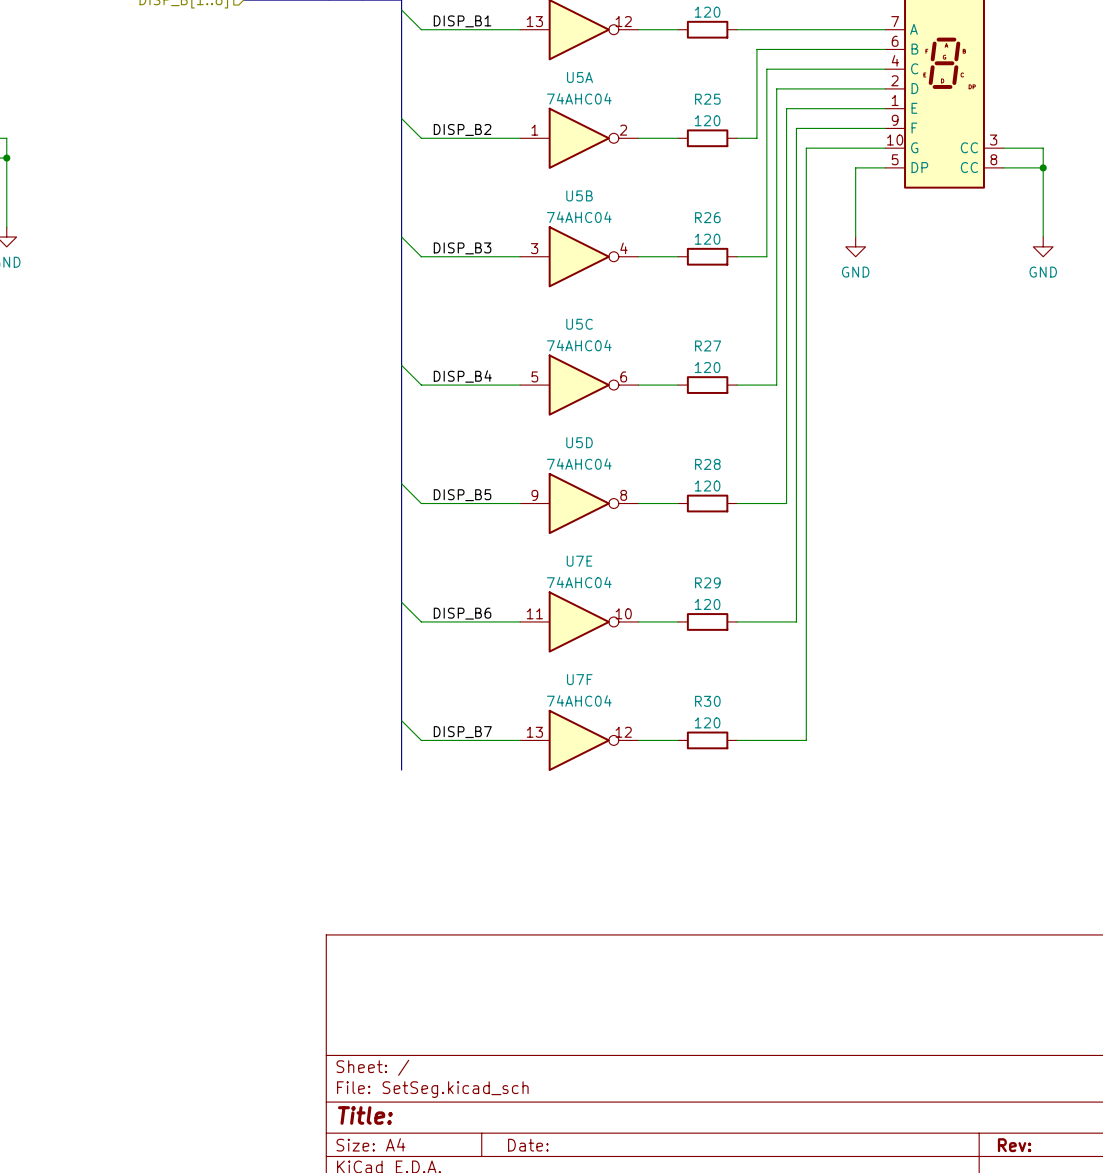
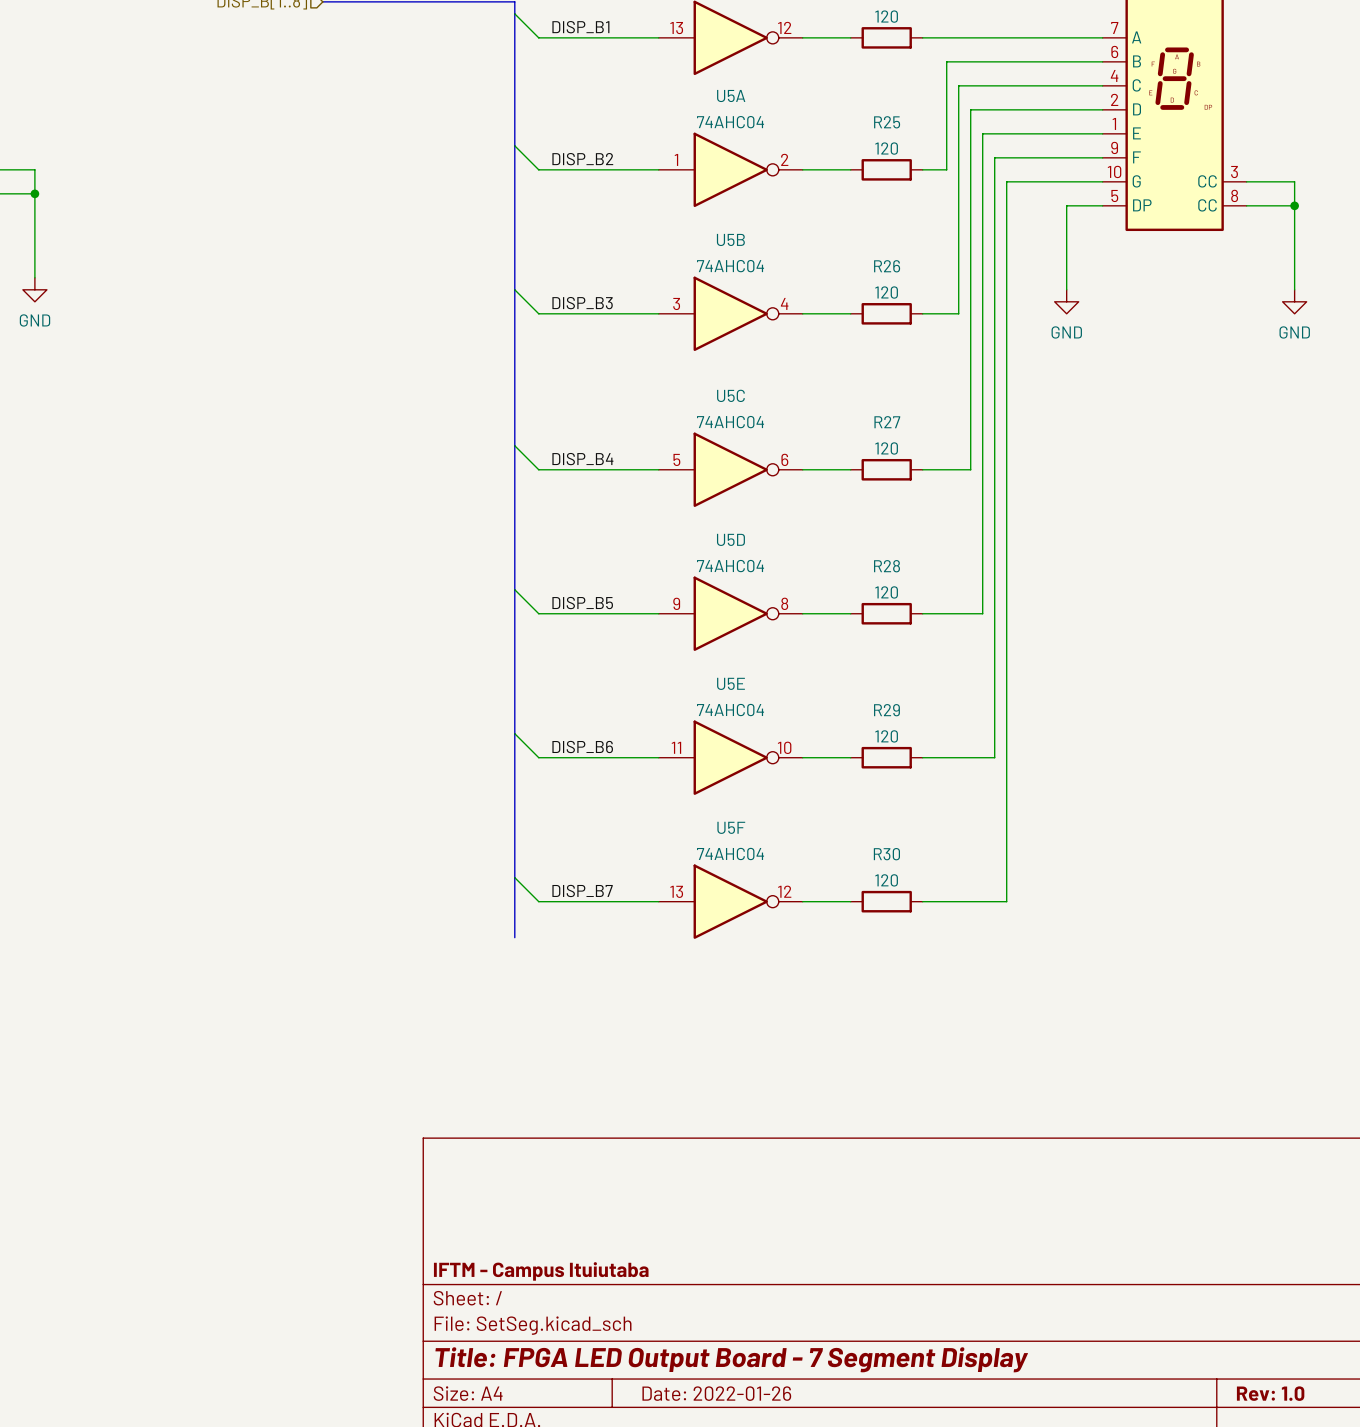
U7E name: U7E (579, 561) -> U5E (730, 683)
U7F name: U7F (579, 679) -> U5F (731, 827)
title block: none -> IFTM - Campus Ituiutaba (541, 1271)
title block: Title: (365, 1115) -> Title: FPGA LED Output Board - 7 Segment Display (731, 1359)
title block: Date: (528, 1145) -> Date: 2022-01-26 (716, 1393)
title block: Rev: (1014, 1145) -> Rev: 1.0 (1270, 1393)

